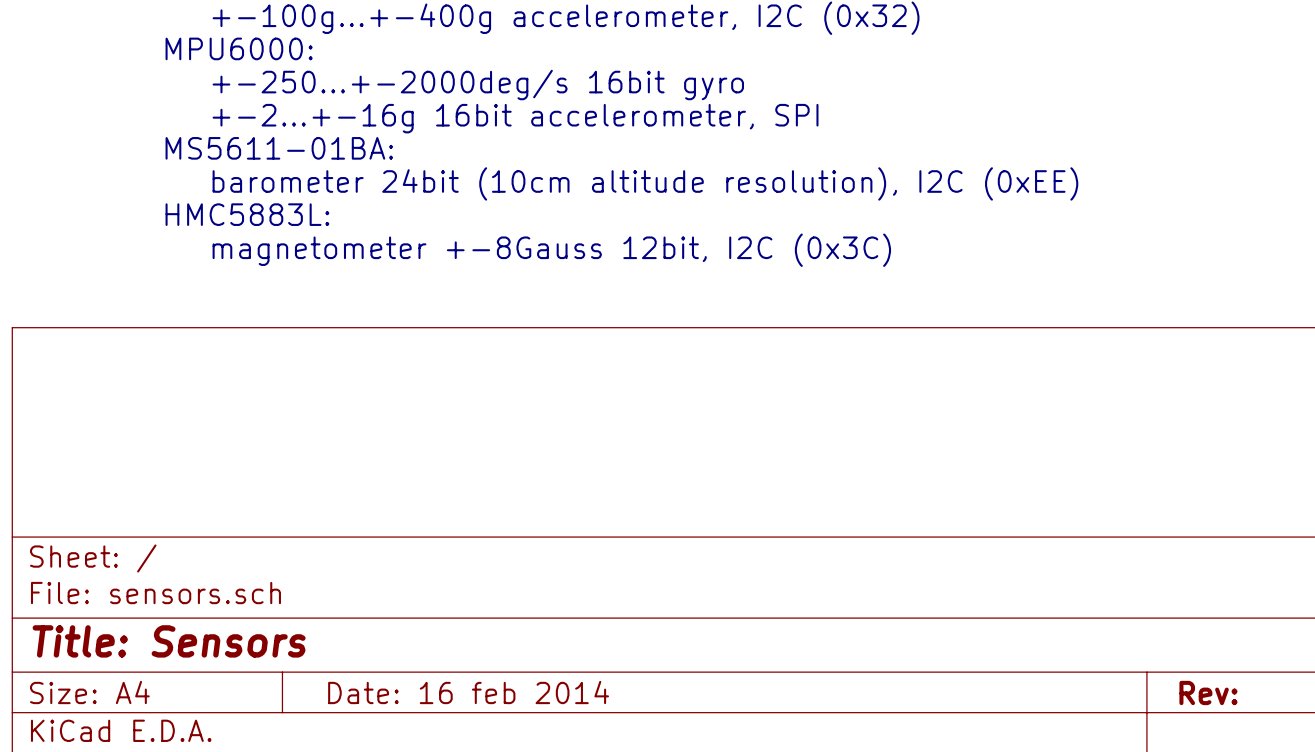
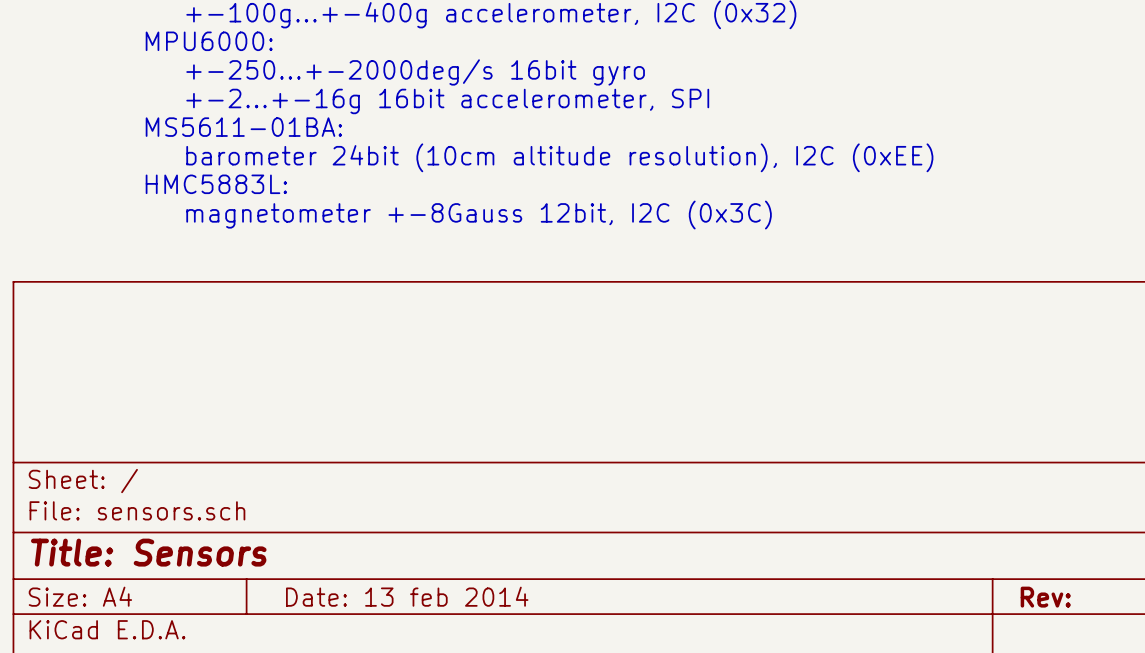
title block: Date: 16 feb 2014 (468, 692) -> Date: 13 feb 2014 (407, 596)

